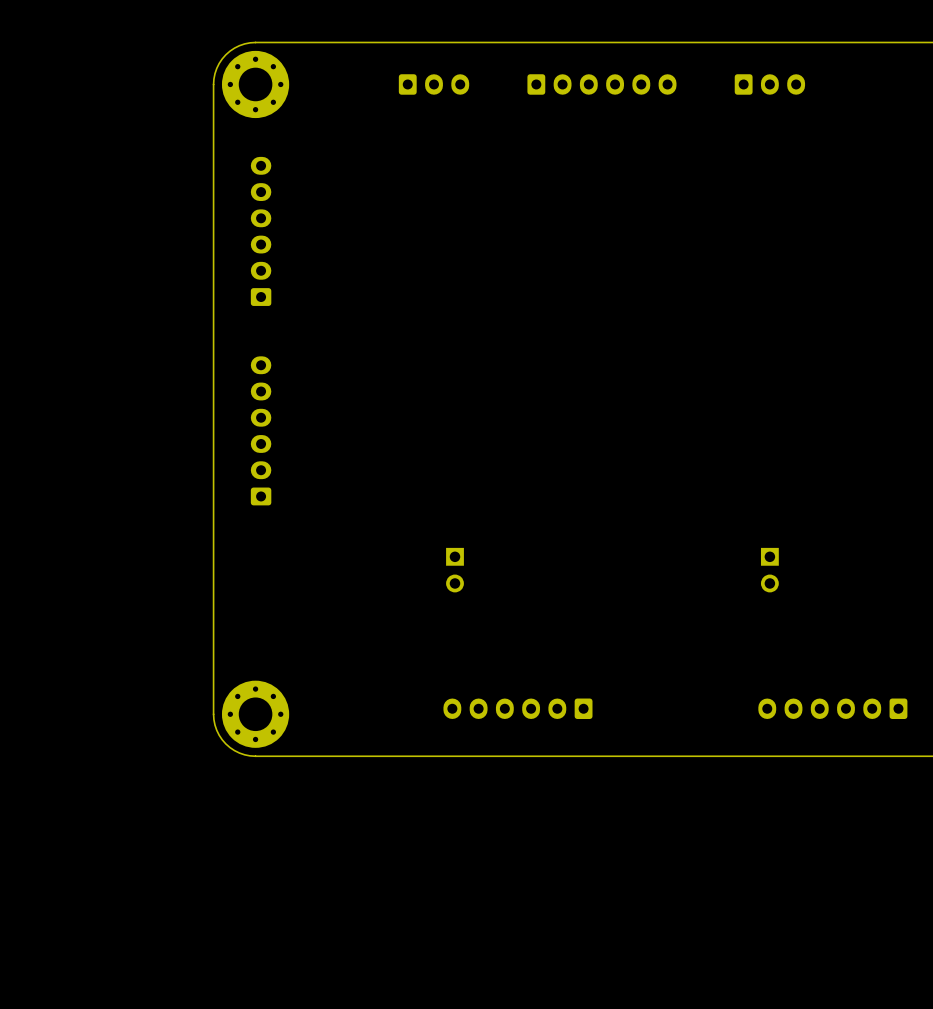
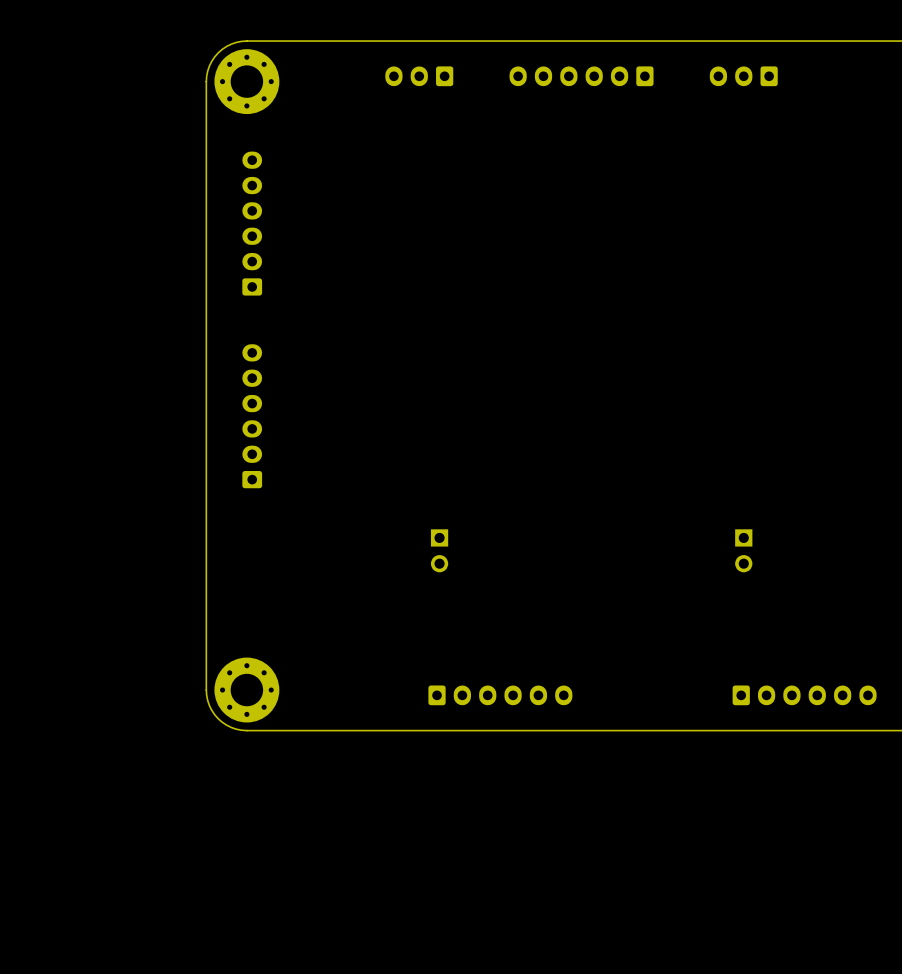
part rotation: 0° (434, 84) -> 180° (419, 76)
part rotation: 0° (601, 84) -> 180° (581, 76)
part rotation: 0° (769, 84) -> 180° (743, 76)
part rotation: 0° (517, 708) -> 180° (500, 695)
part rotation: 0° (832, 708) -> 180° (804, 695)

